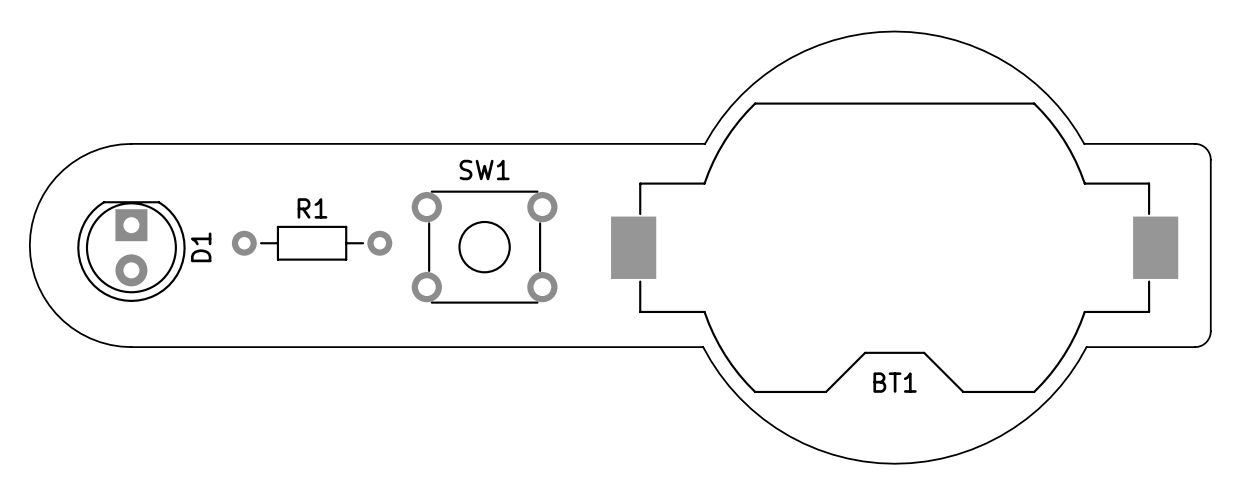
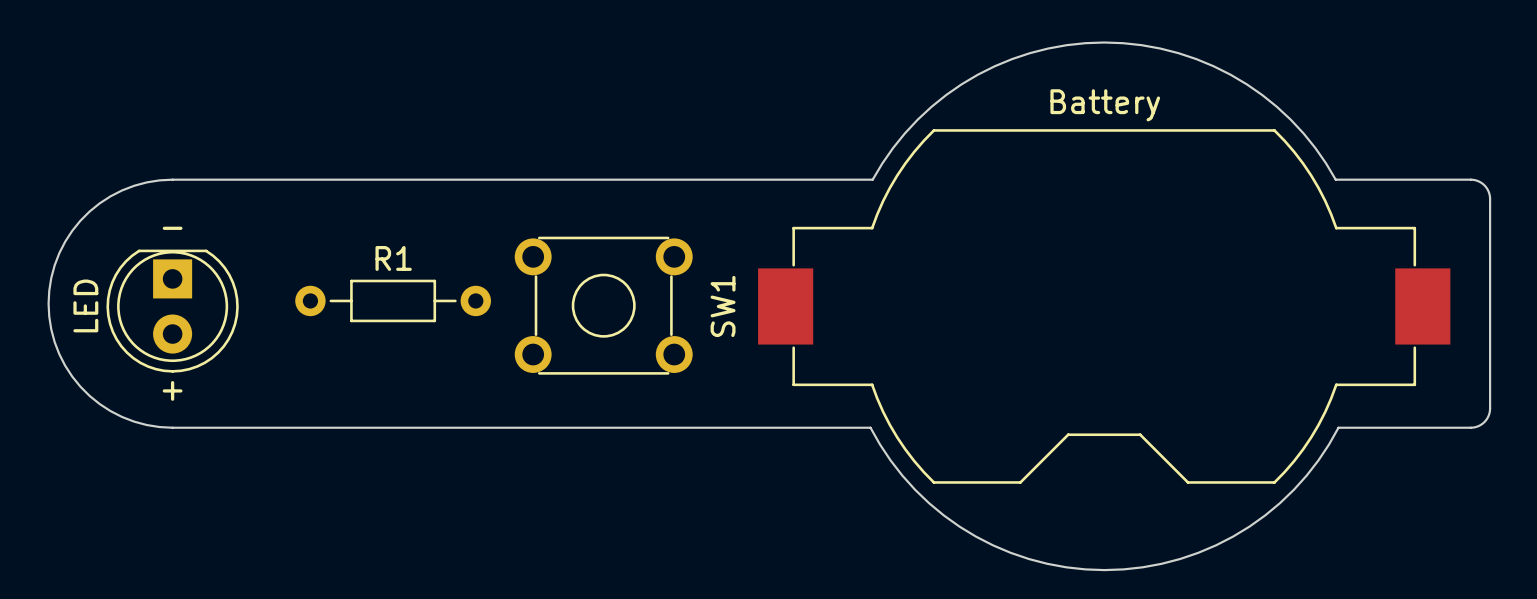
BT1 value: none -> Battery (1105, 105)
SW1 name rotation: 0° (484, 170) -> 90° counterclockwise (723, 306)
SW1 name position: SW1 (484, 170) -> SW1 (723, 306)
text: none -> - (172, 228)
D1 value: none -> LED (85, 305)
D1 name: D1 (201, 247) -> none
text: none -> + (172, 390)
BT1 name: BT1 (895, 382) -> none

